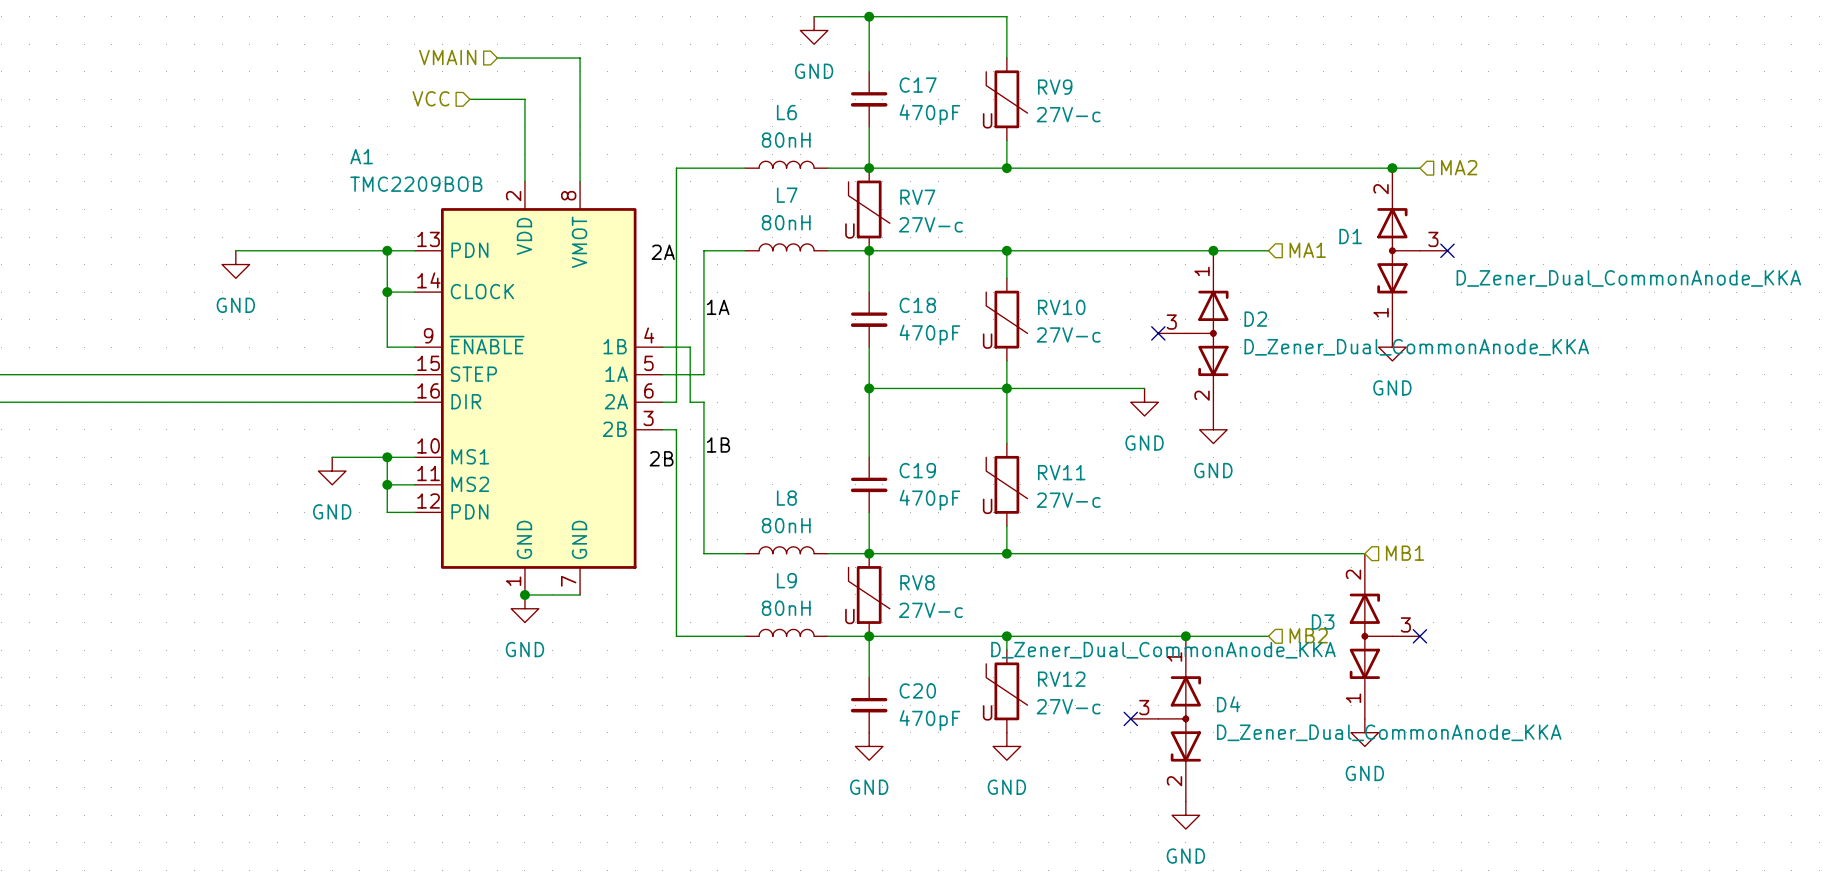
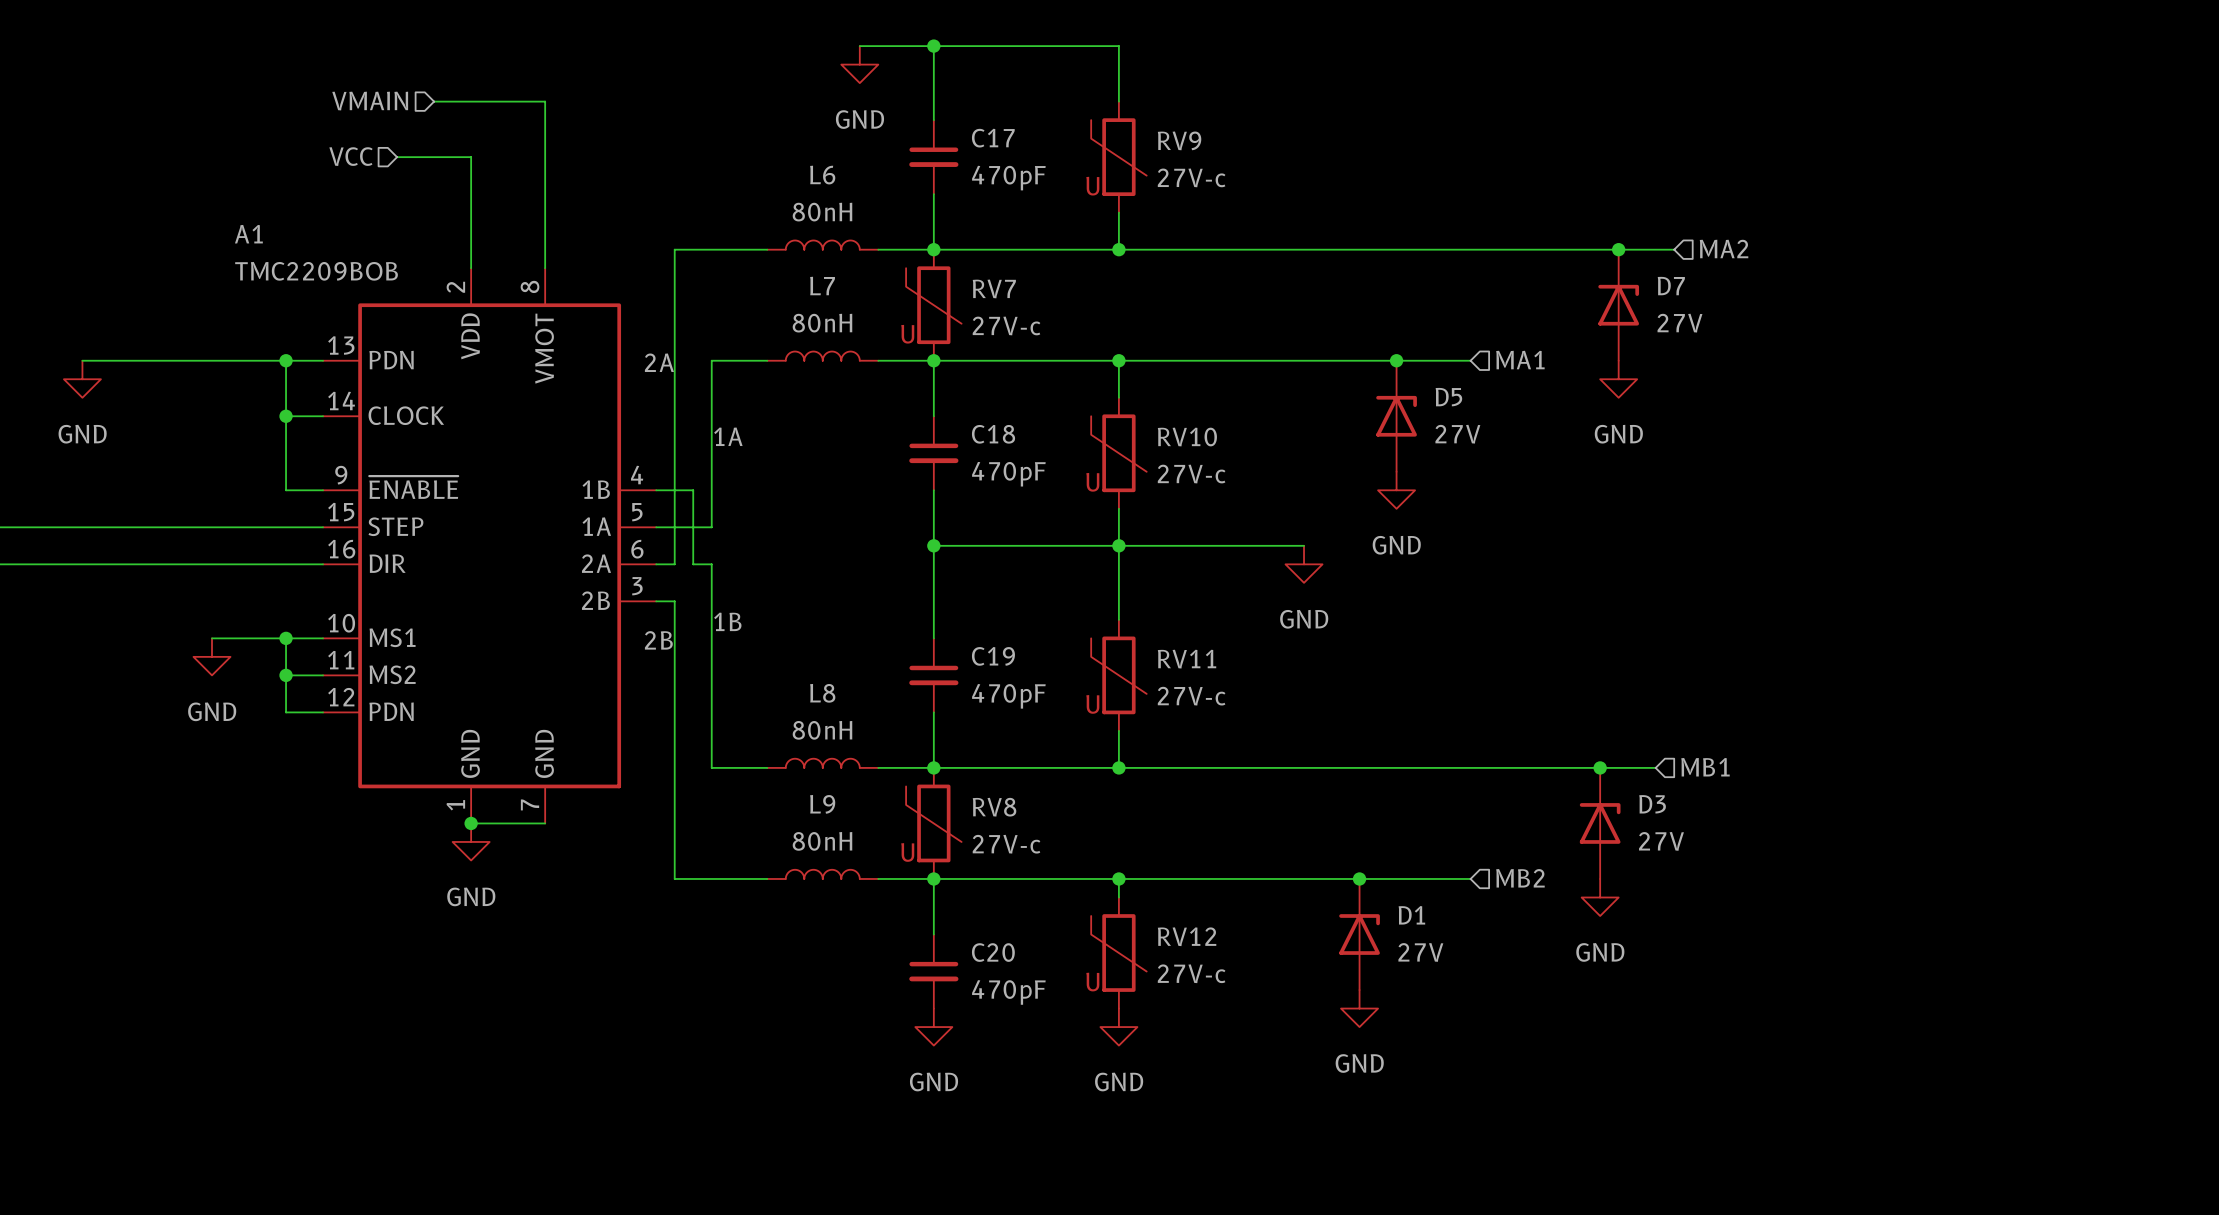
D1 symbol: [1377, 168, 1448, 334] -> [1339, 878, 1380, 991]
junction position: (1392, 168) -> (1618, 249)
D7: none -> 27V (1618, 305)
D1 name position: D1 (1350, 236) -> D1 (1411, 915)
no-connect mark: (1447, 250) -> none
D1 value: D_Zener_Dual_CommonAnode_KKA (1628, 278) -> 27V (1420, 952)
D5: none -> 27V (1396, 416)
no-connect mark: (1158, 333) -> none
D2: D_Zener_Dual_CommonAnode_KKA (1193, 333) -> none
power symbol position: GND (1392, 347) -> GND (1618, 379)
power symbol position: GND (1213, 429) -> GND (1396, 490)
D3 symbol: [1349, 553, 1420, 719] -> [1579, 767, 1621, 879]
wire: none -> (1600, 767) (1655, 767)
junction: none -> (1600, 767)
hierarchical label position: MB1 (1405, 553) -> MB1 (1705, 767)
D3 name position: D3 (1323, 622) -> D3 (1652, 804)
no-connect mark: (1419, 636) -> none
D3 value: D_Zener_Dual_CommonAnode_KKA (1163, 650) -> 27V (1661, 841)
no-connect mark: (1130, 718) -> none
D4: D_Zener_Dual_CommonAnode_KKA (1165, 718) -> none
power symbol position: GND (1364, 732) -> GND (1600, 897)
power symbol position: GND (1185, 815) -> GND (1359, 1008)

